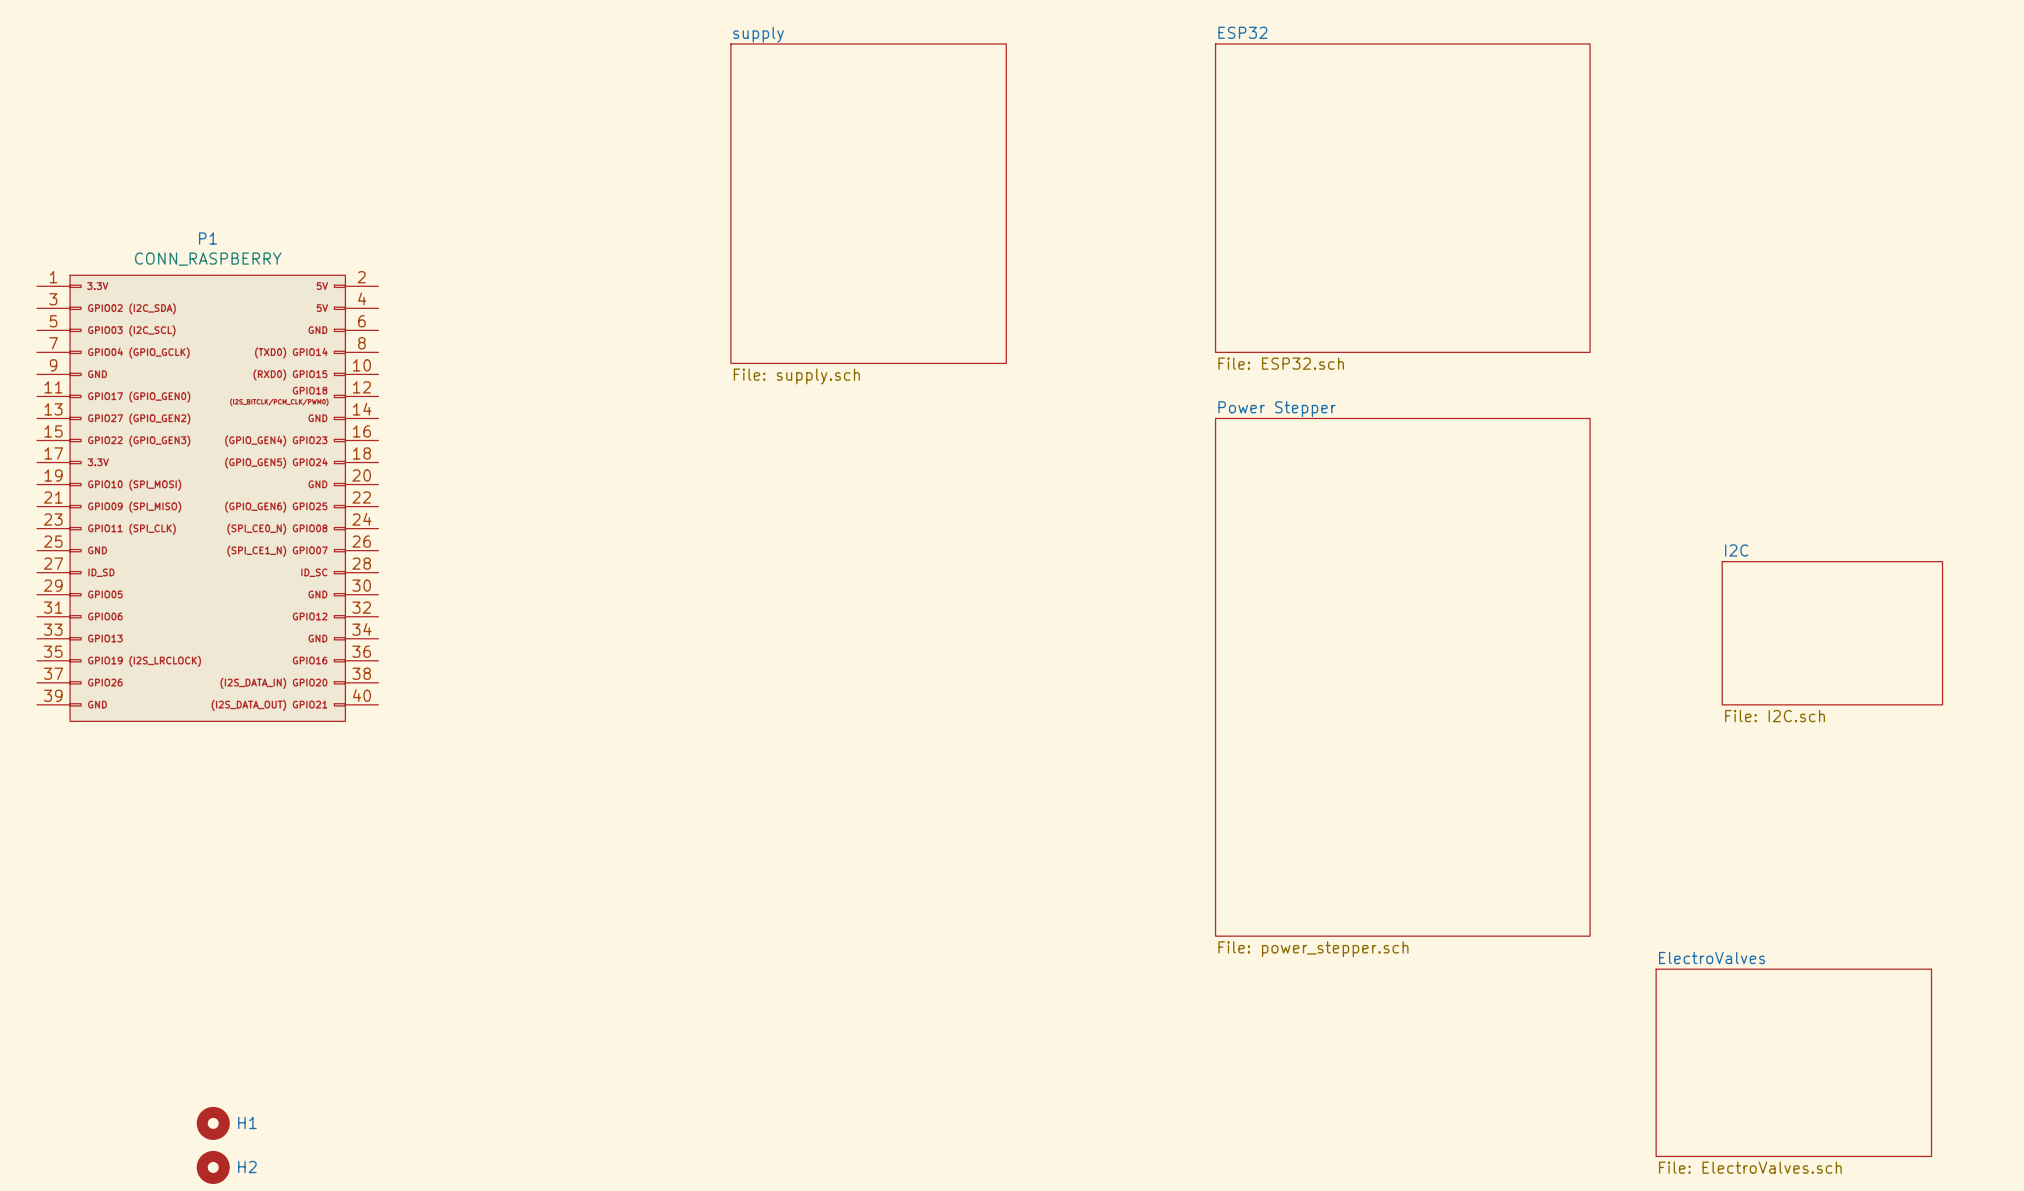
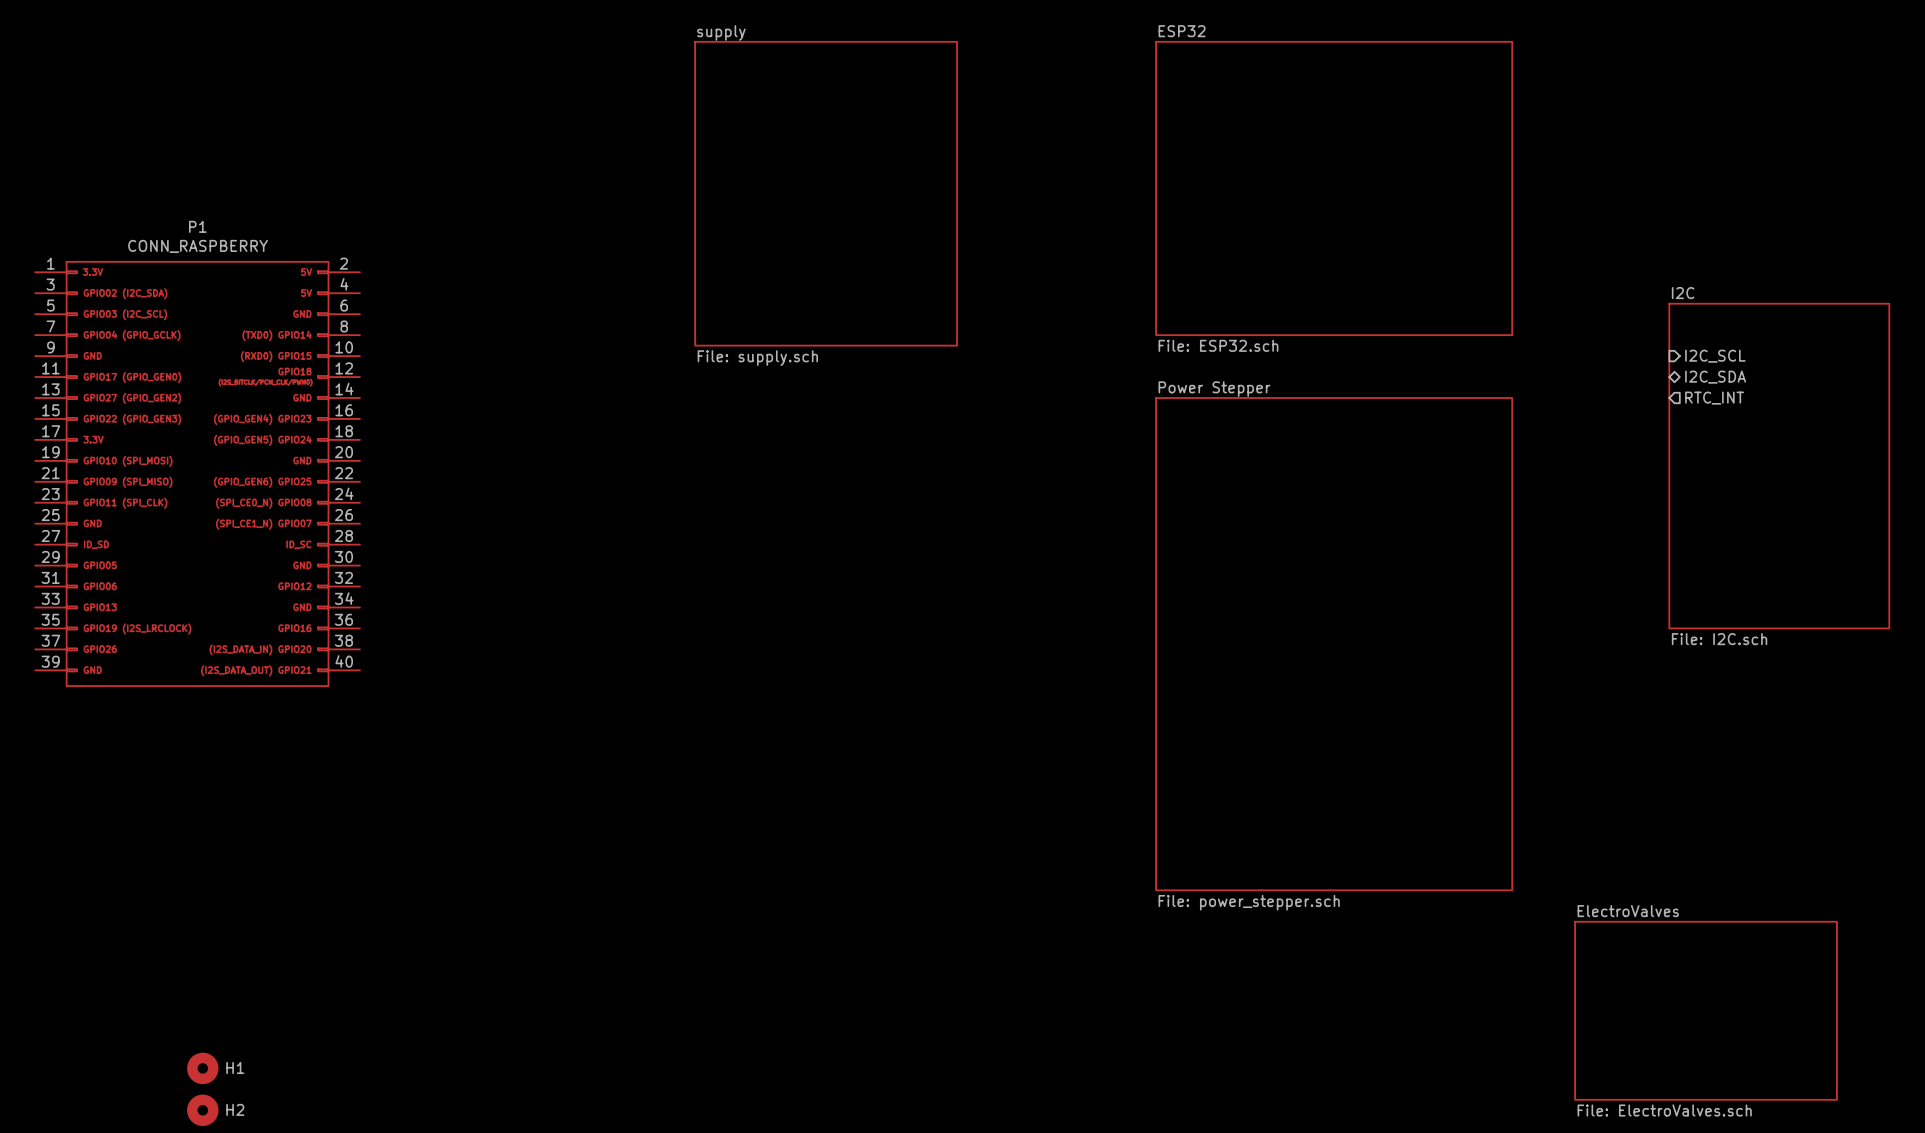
sheet pin: none -> I2C_SCL (1715, 356)
sheet pin: none -> I2C_SDA (1715, 377)
sheet pin: none -> RTC_INT (1714, 398)
sheet I2C name position: I2C (1736, 550) -> I2C (1683, 293)
sheet I2C shape: [1722, 561, 1943, 705] -> [1669, 303, 1890, 629]
sheet I2C value position: File: I2C.sch (1775, 716) -> File: I2C.sch (1719, 639)

